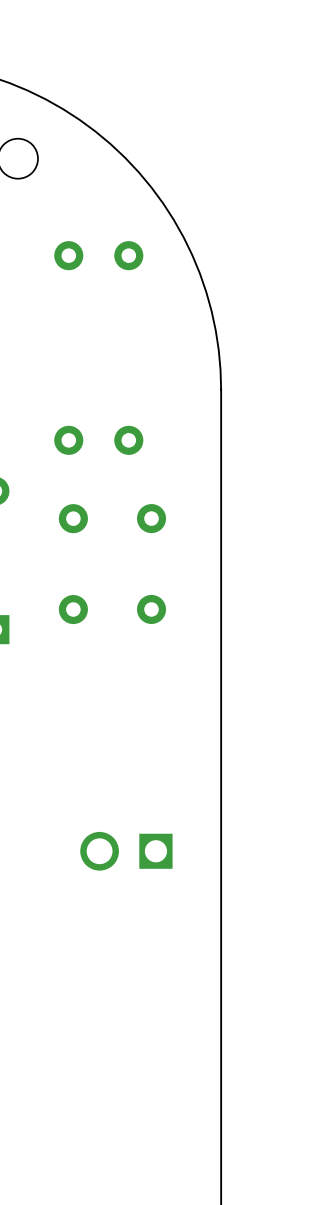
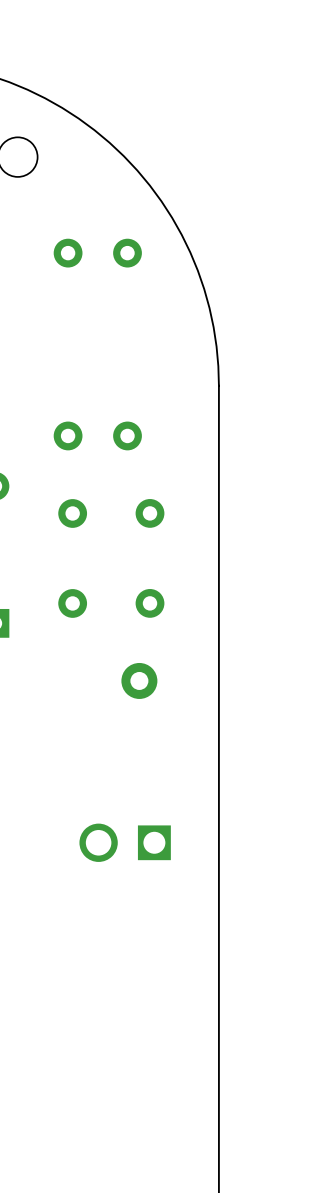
part: none -> (139, 680)

